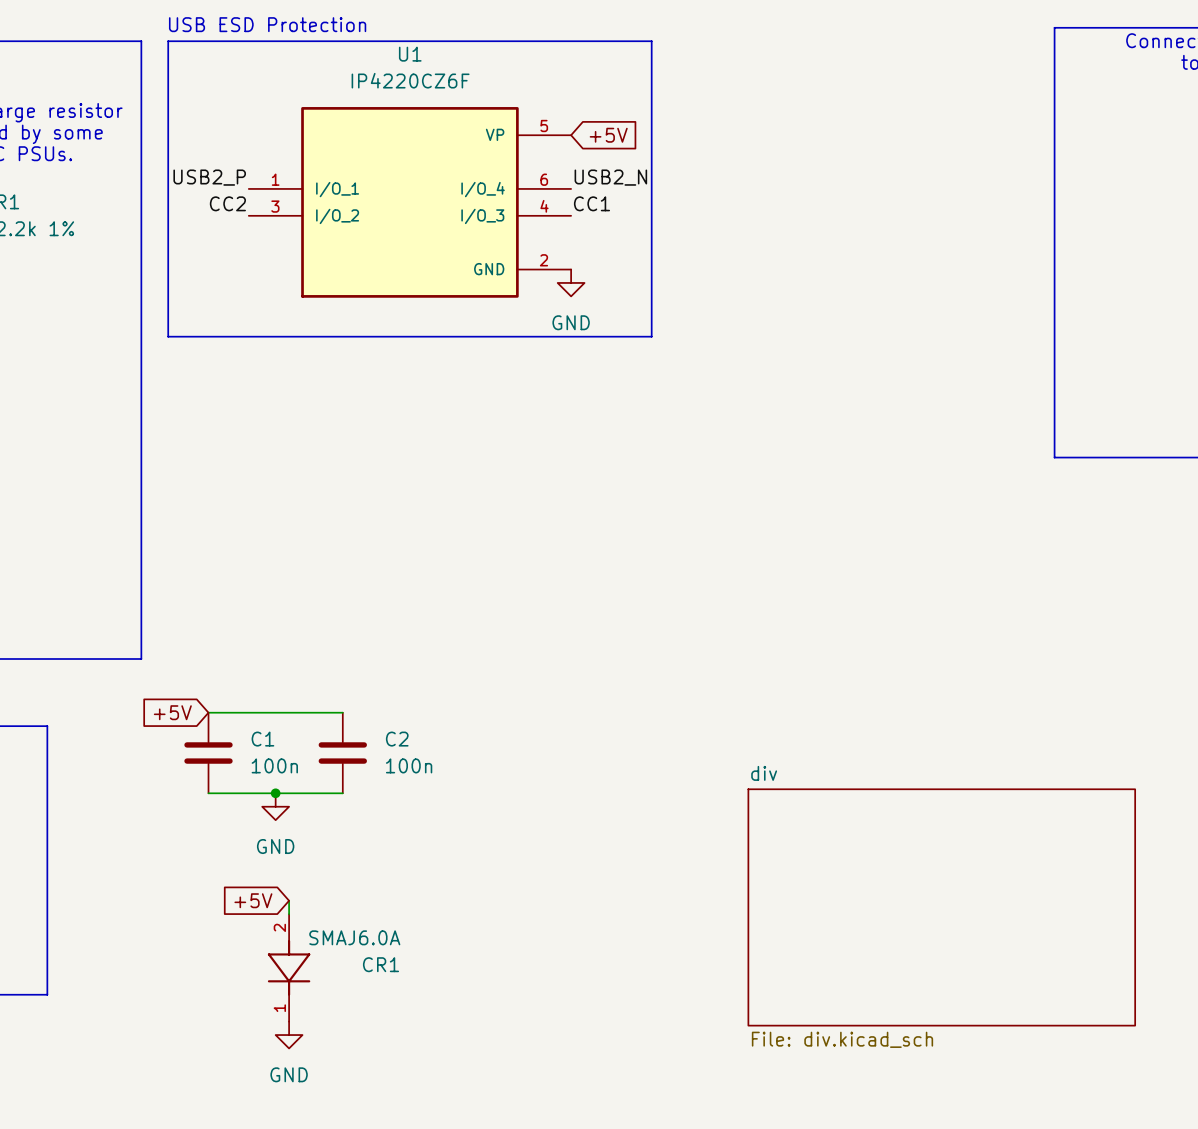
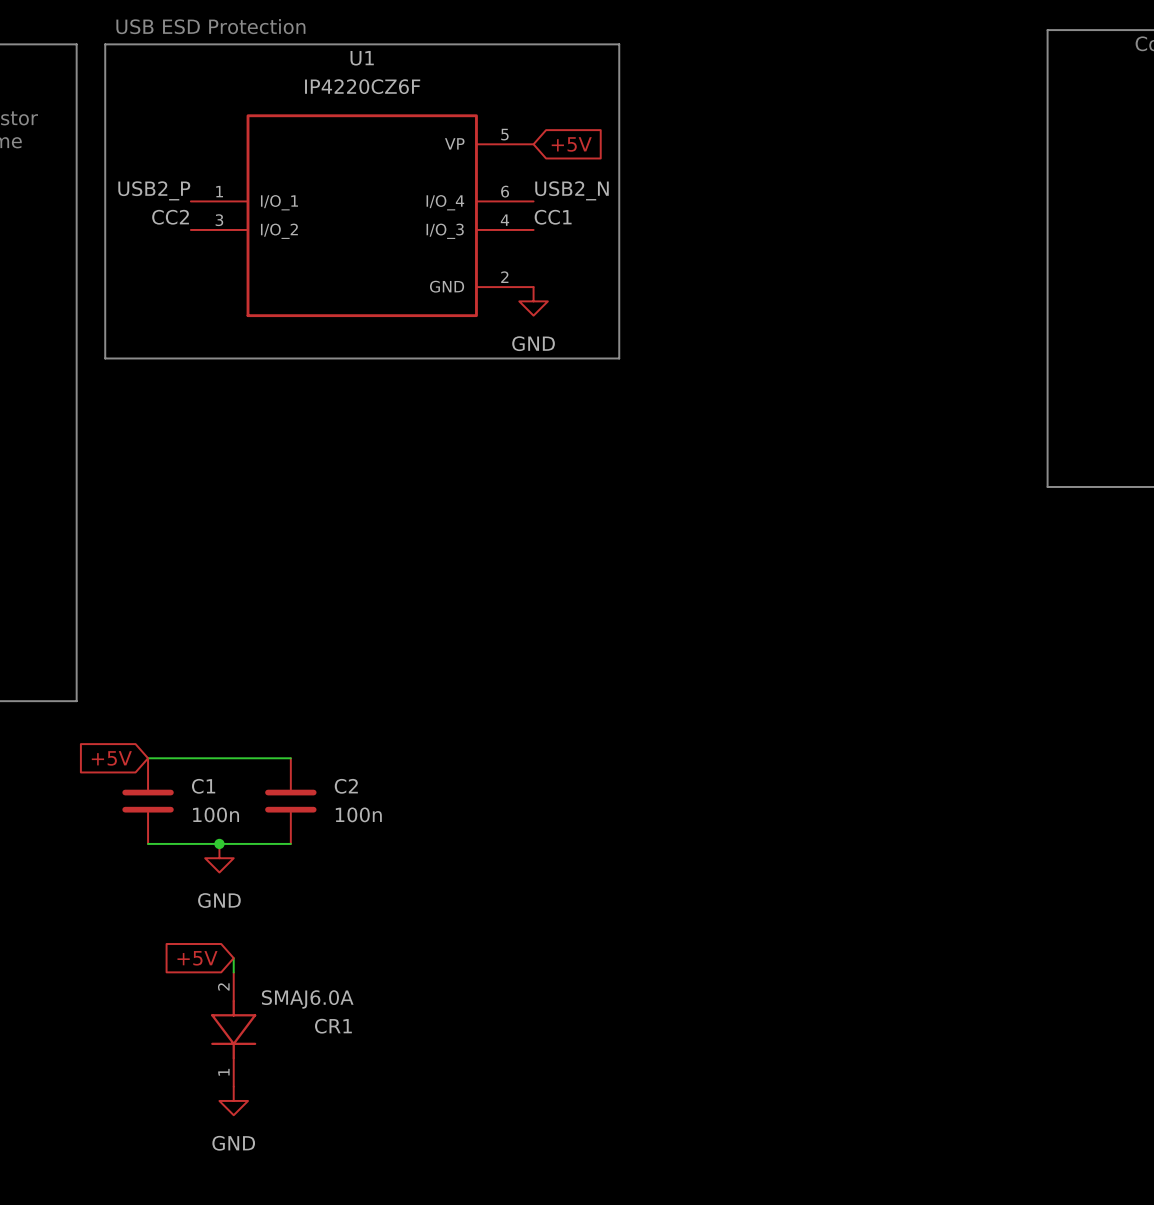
sheet div: File: div.kicad_sch (941, 907) -> none

